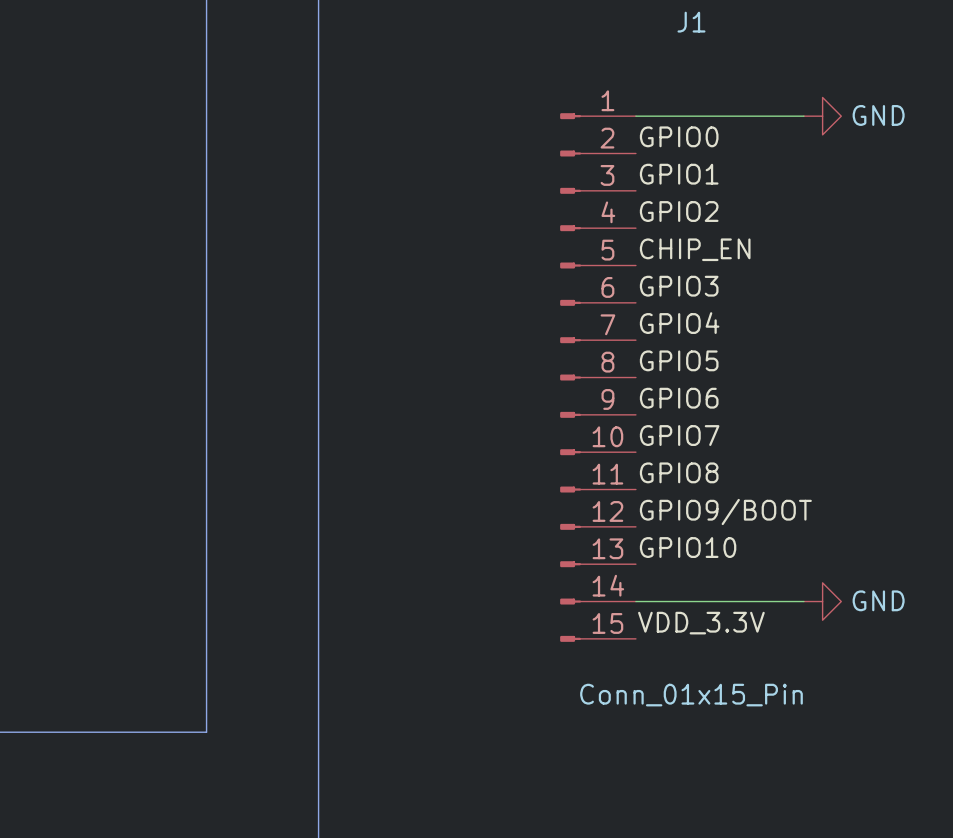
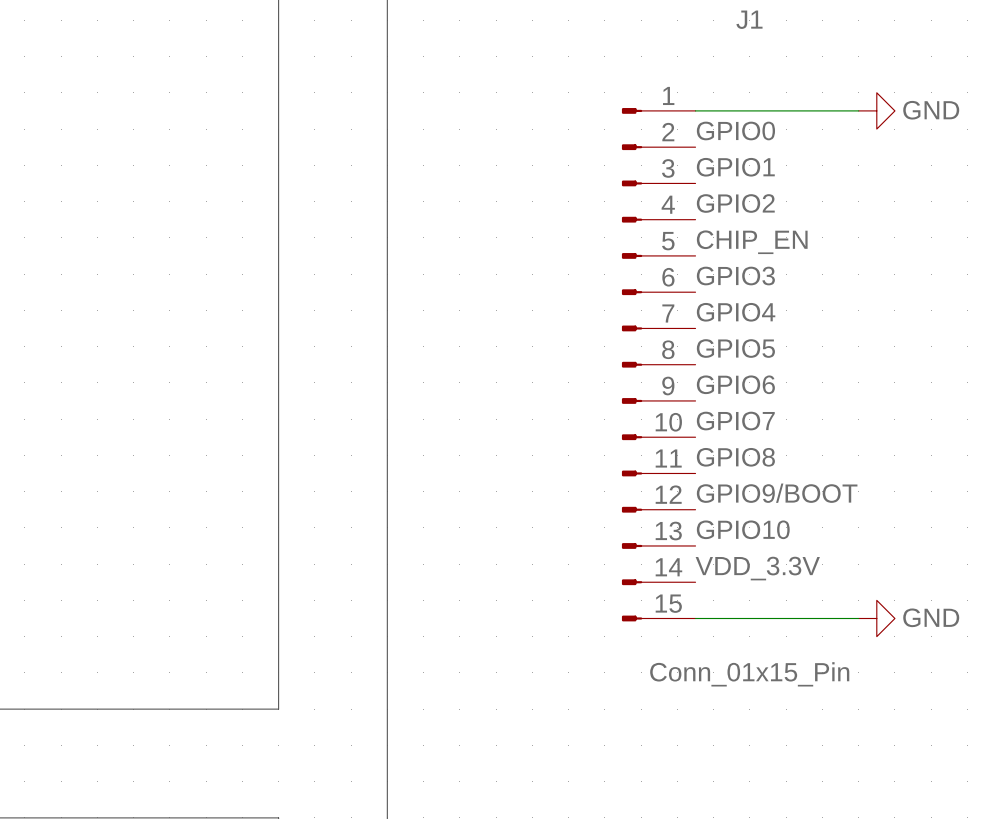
wire: (635, 601) (803, 601) -> (695, 618) (858, 618)
power symbol position: GND (822, 601) -> GND (876, 618)
label position: VDD_3.3V (701, 623) -> VDD_3.3V (757, 568)

